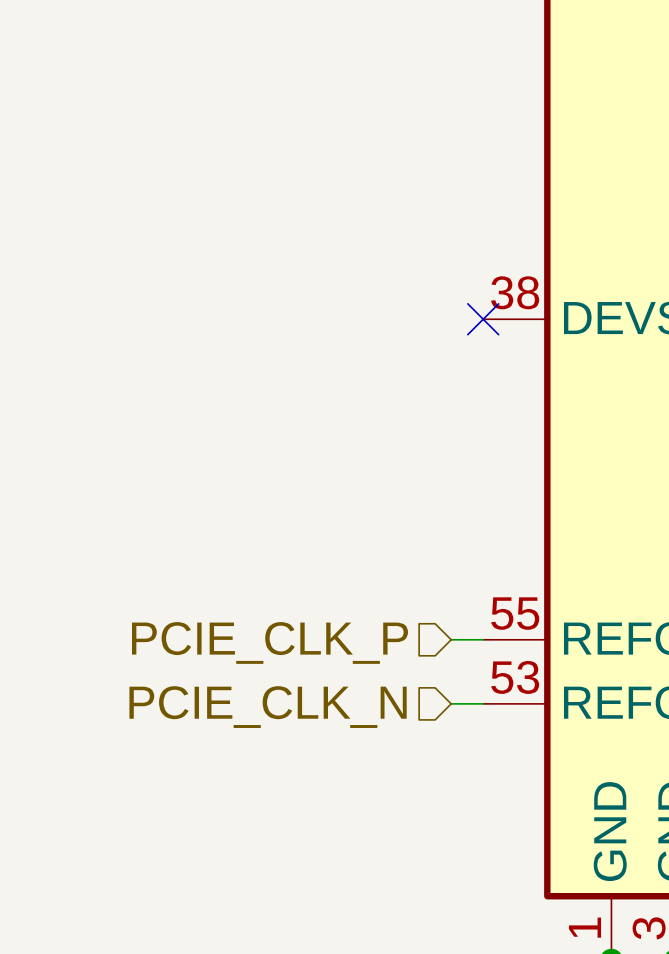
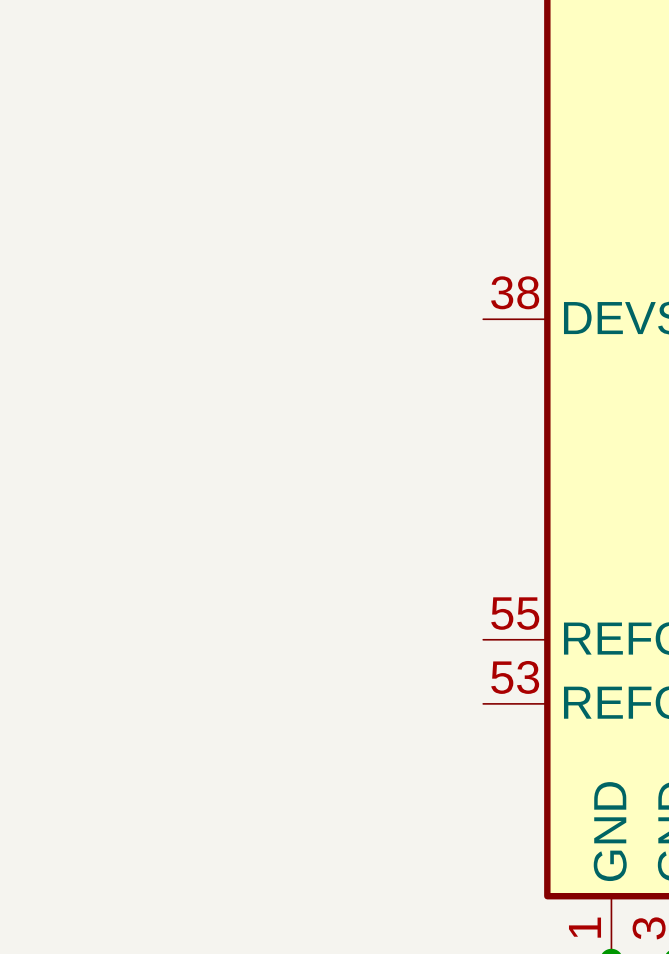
no-connect mark: (483, 319) -> none
wire: (451, 639) (483, 639) -> none
hierarchical label: PCIE_CLK_P (270, 642) -> none
wire: (451, 703) (483, 703) -> none
hierarchical label: PCIE_CLK_N (268, 707) -> none

